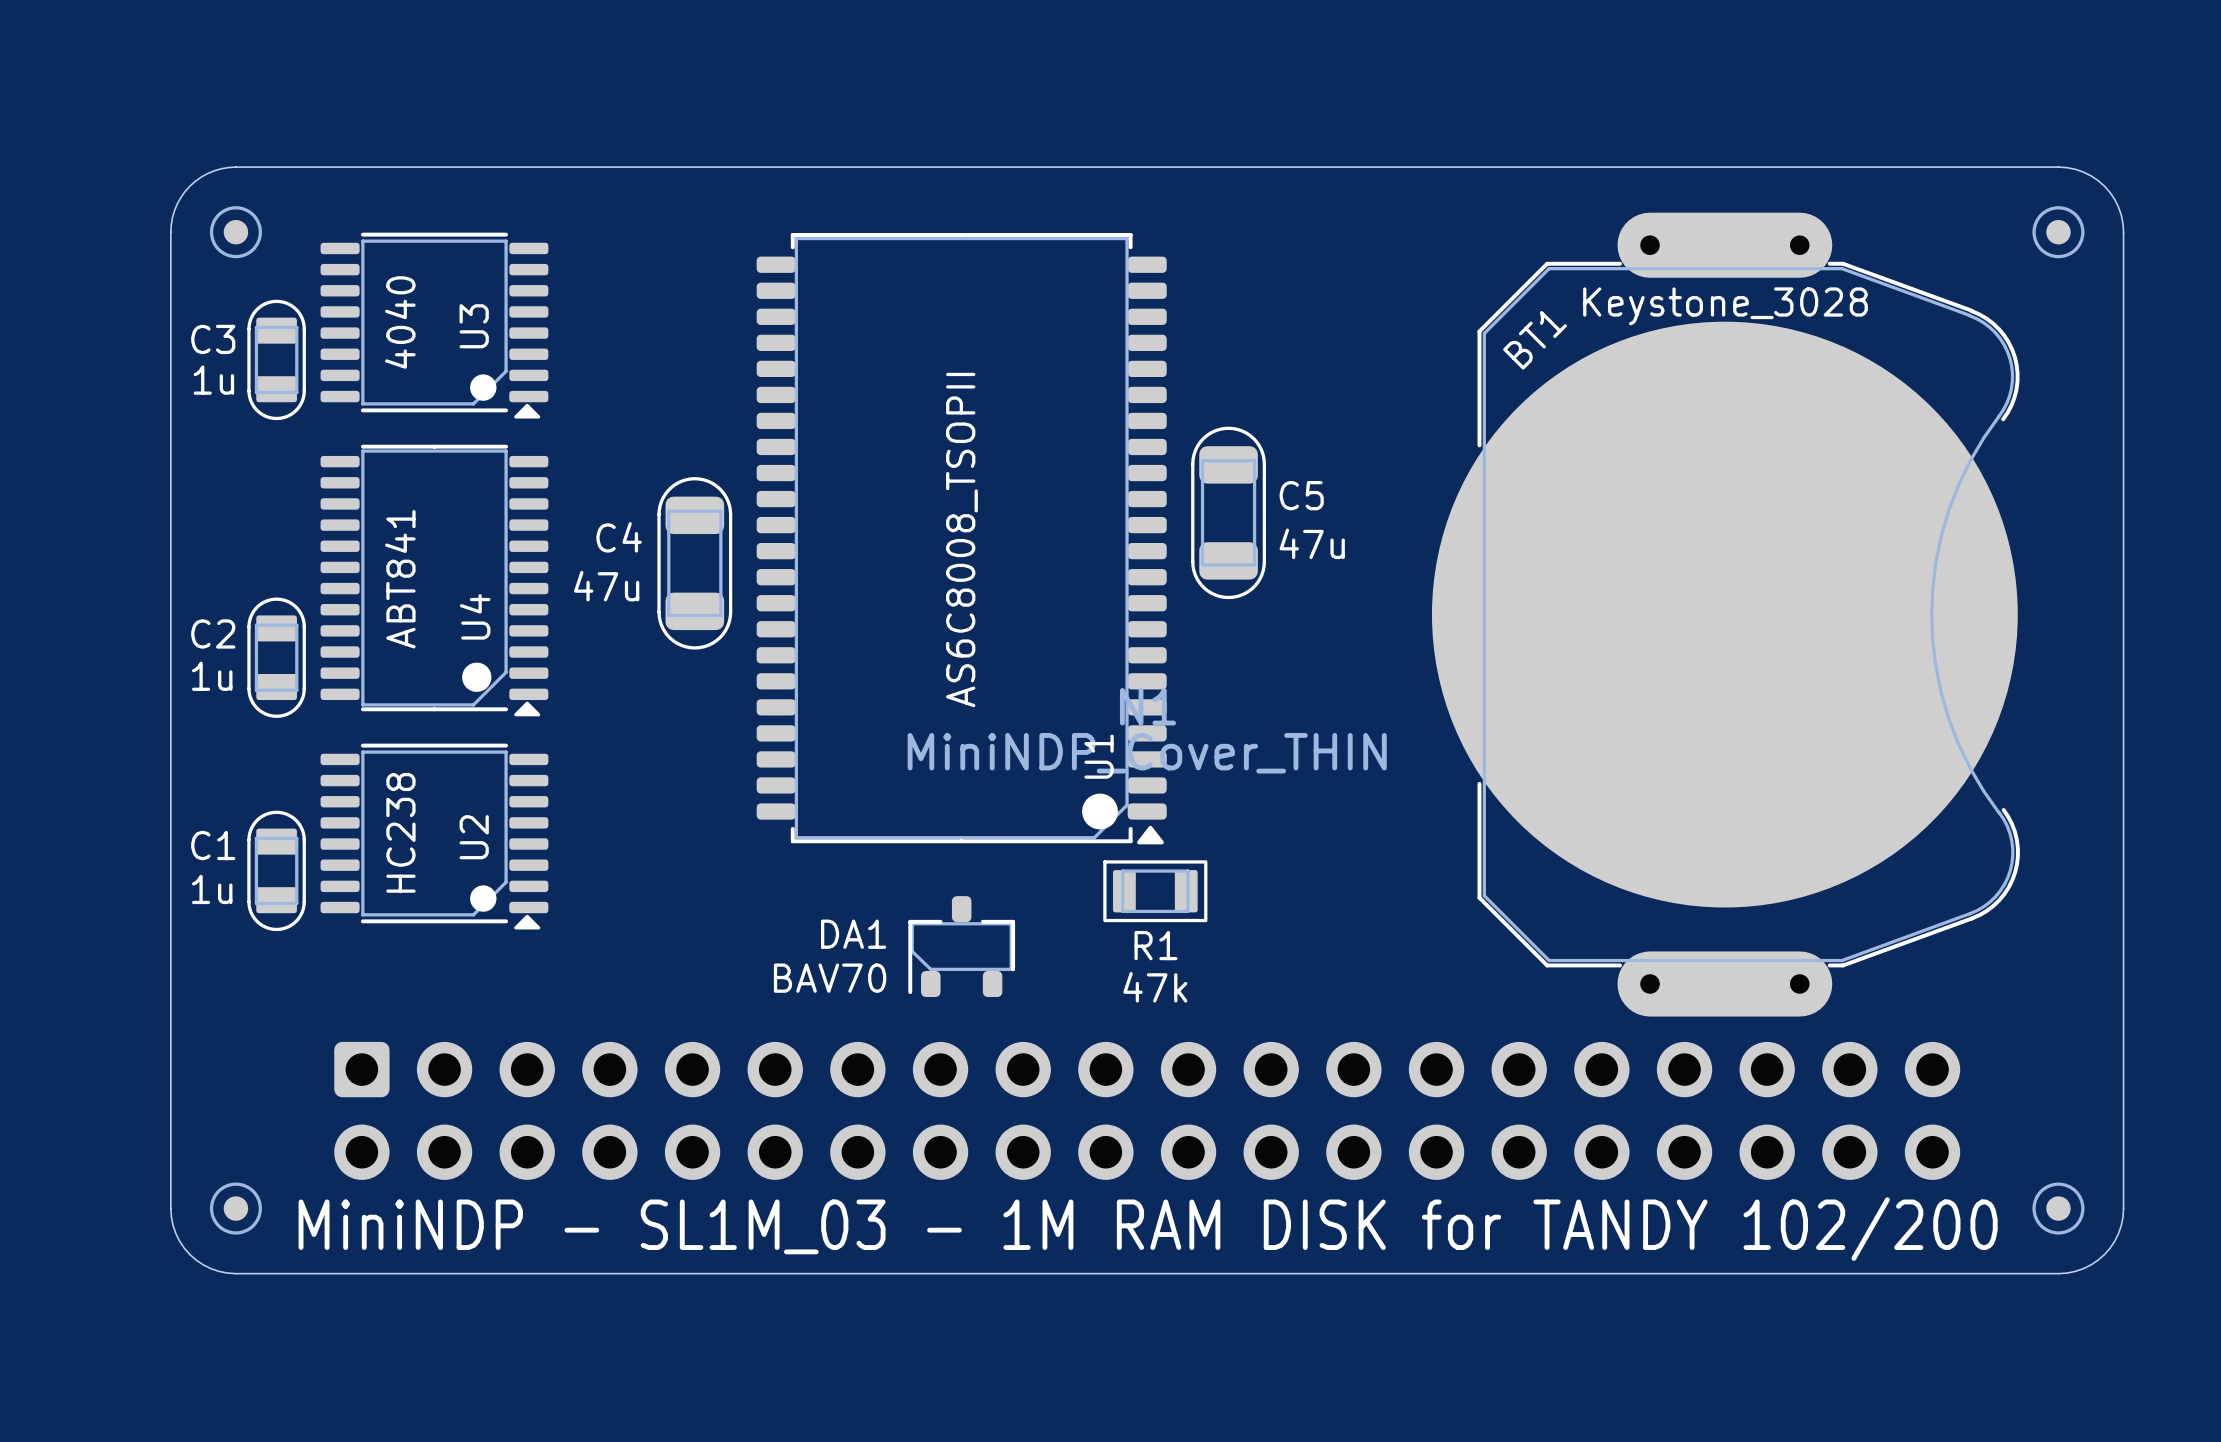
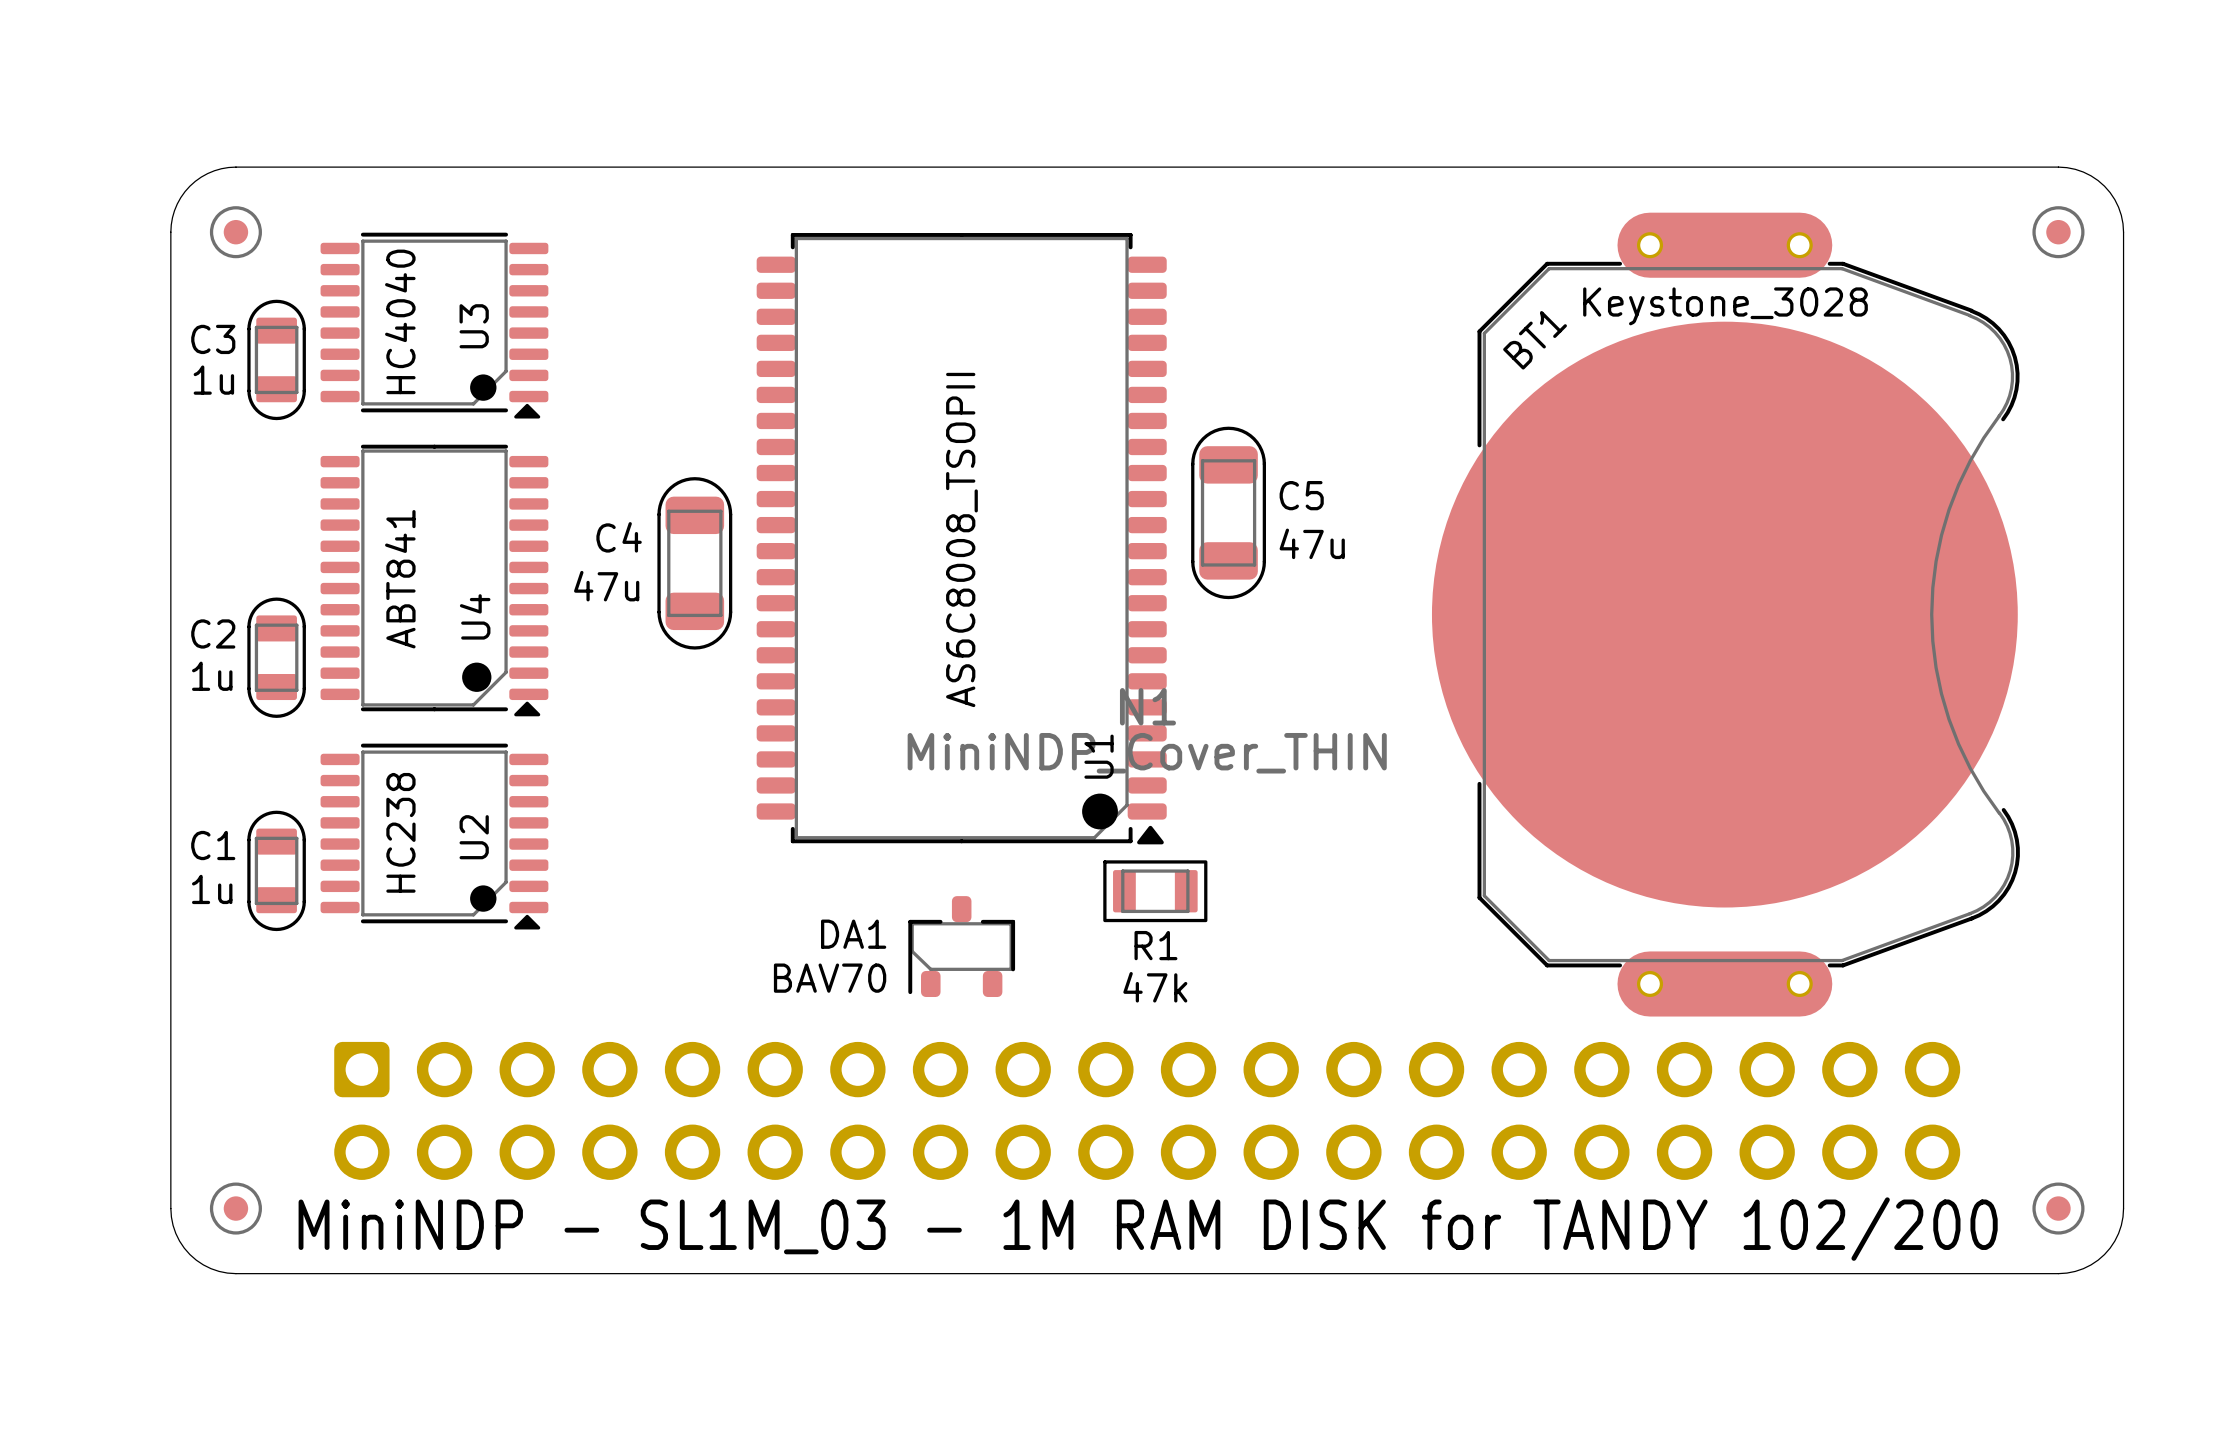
U3 value: 4040 (400, 322) -> HC4040 (400, 321)

